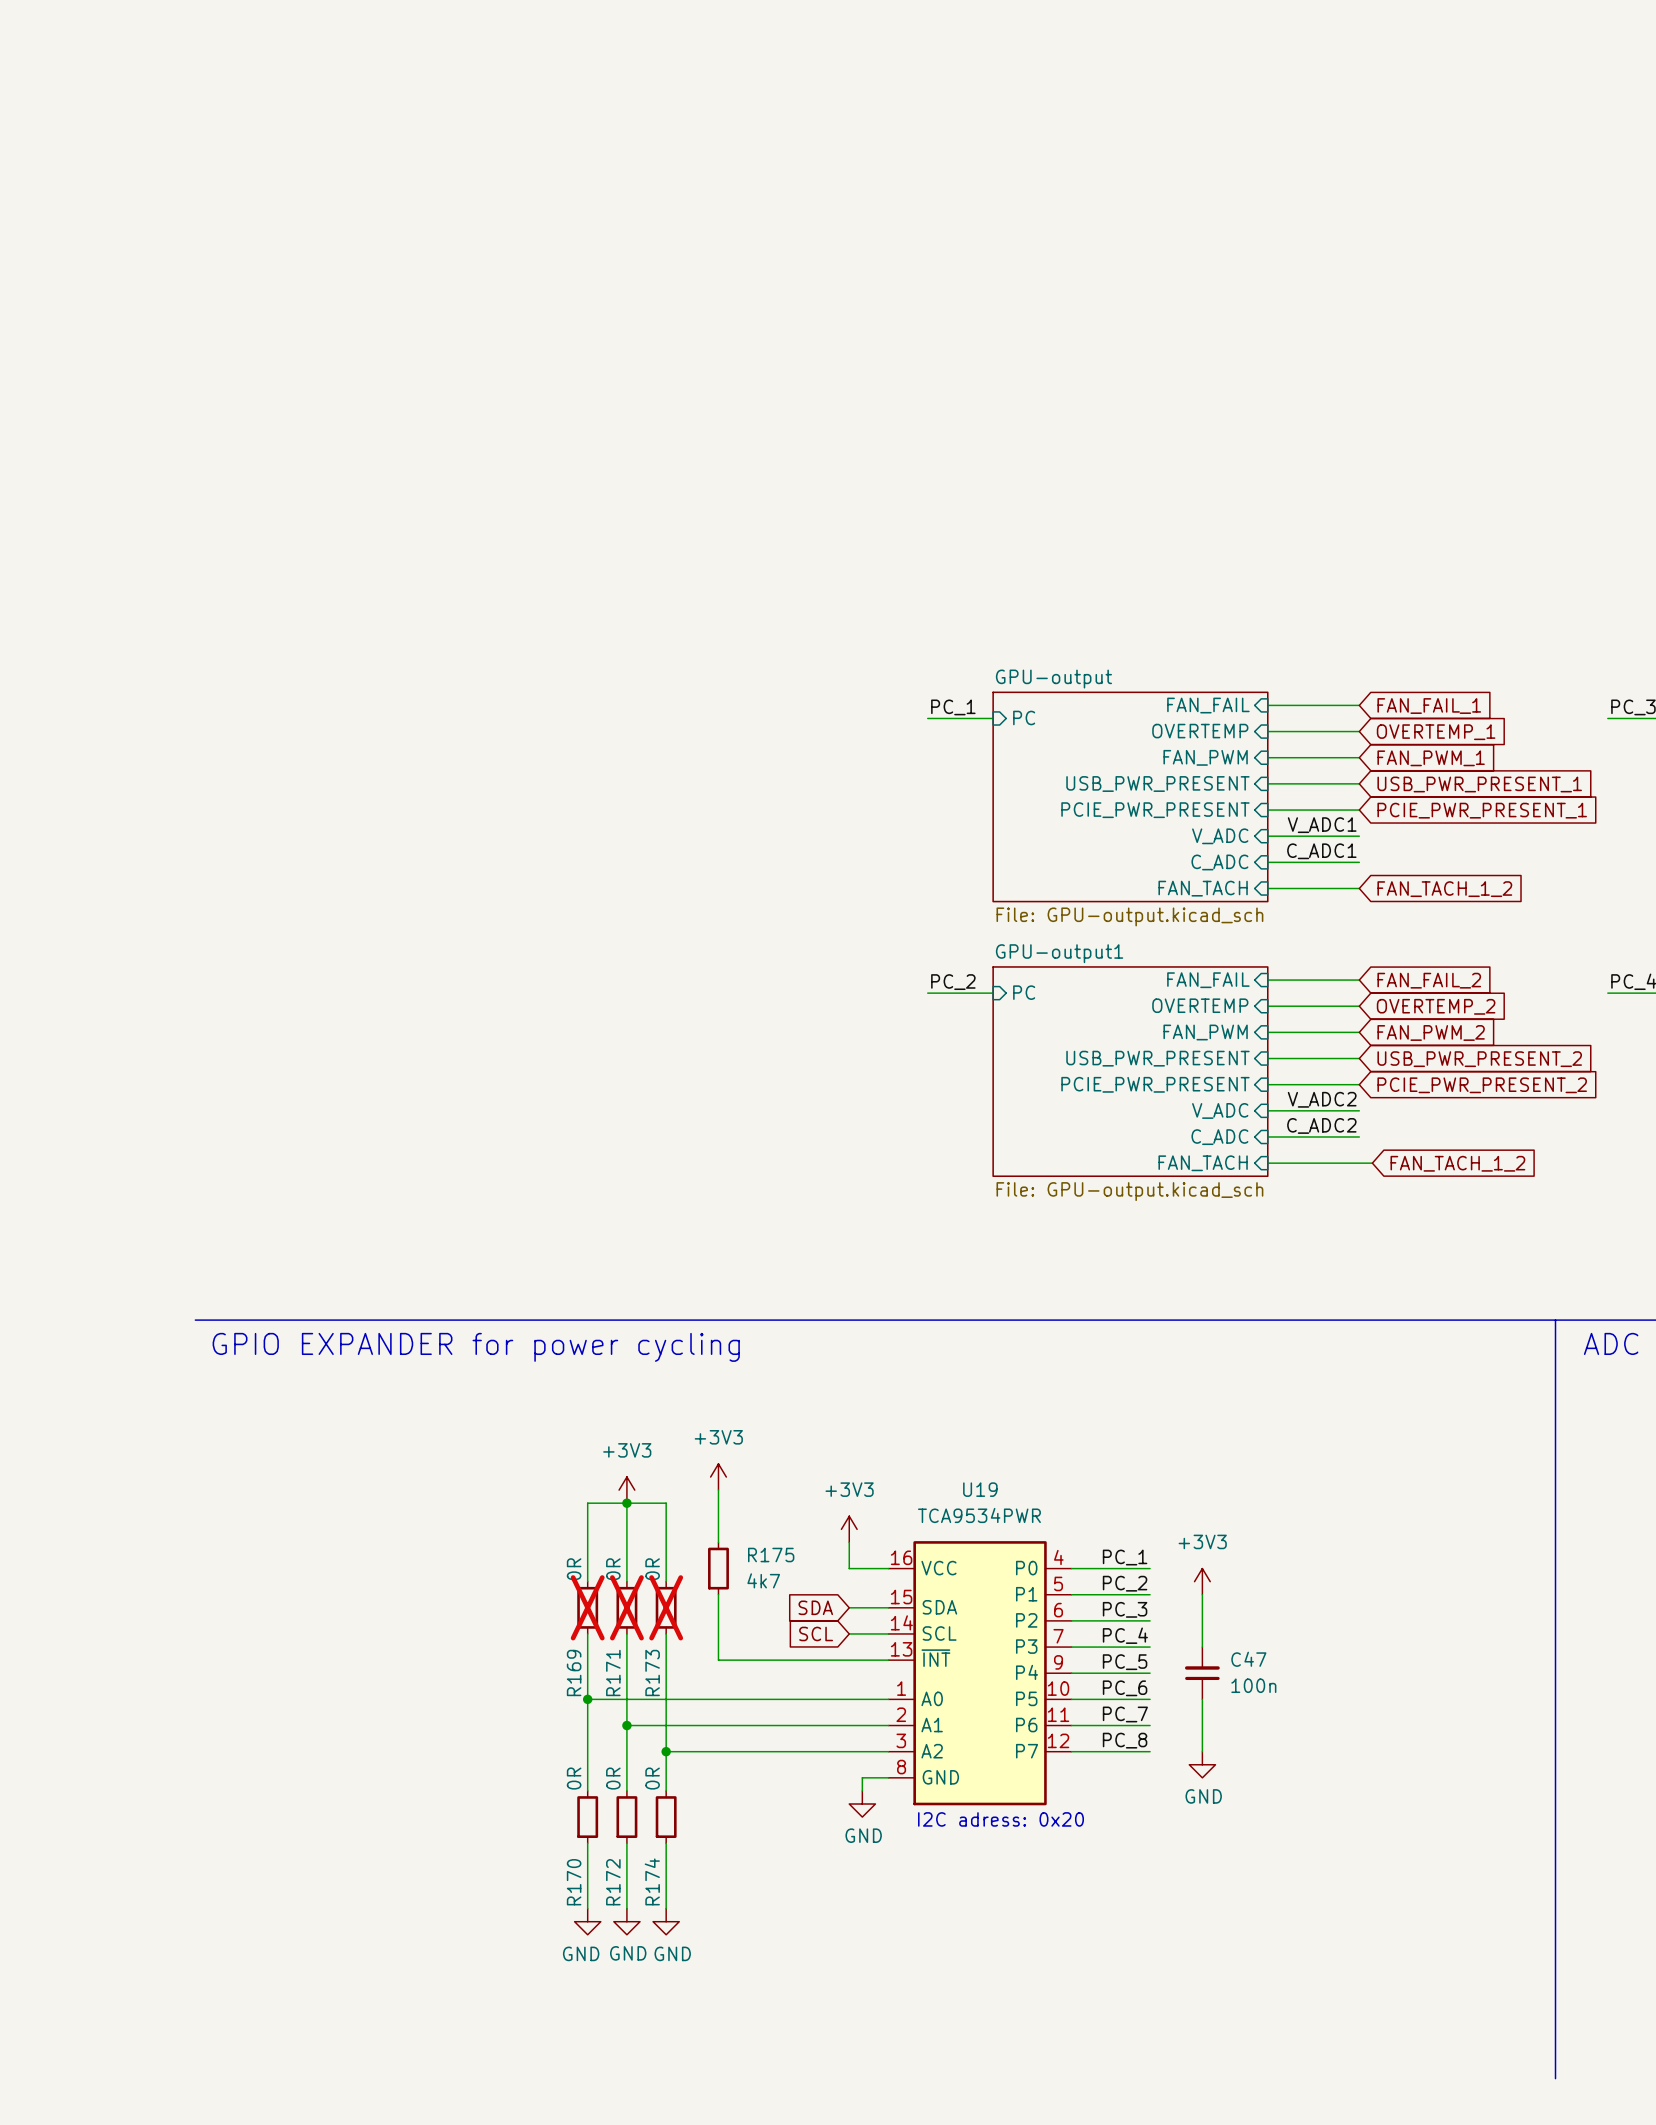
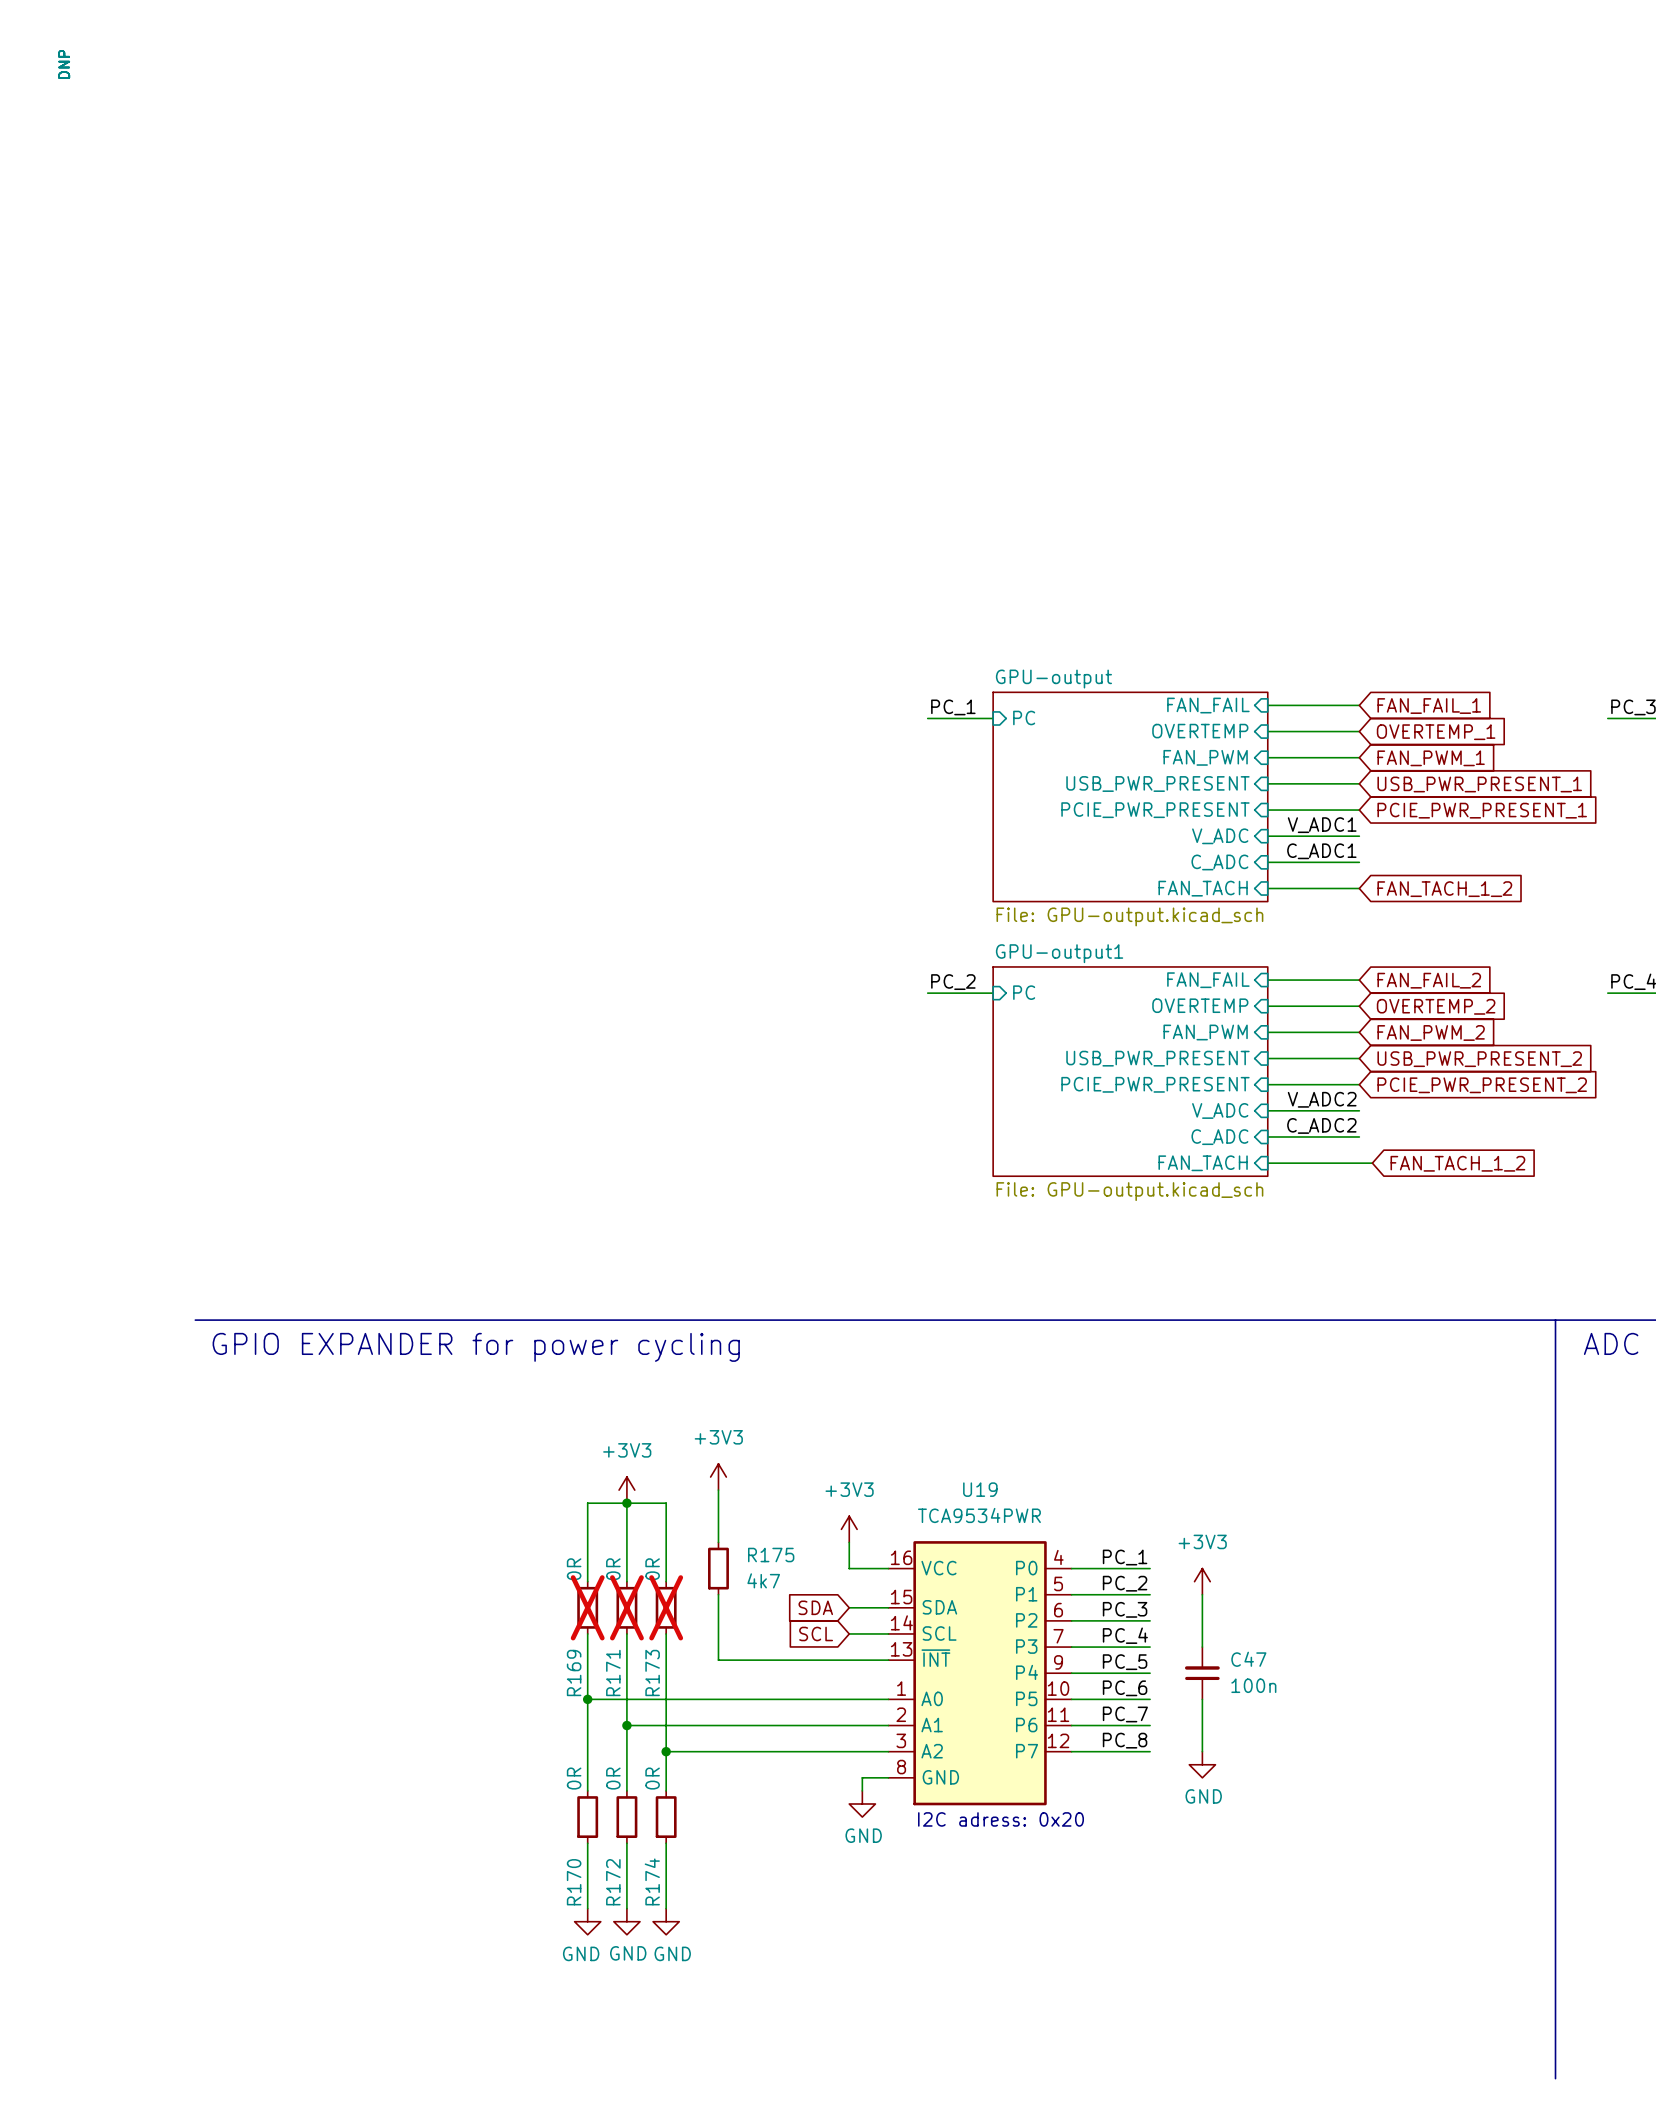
R173 text: none -> DNP (64, 64)
R171 text: none -> DNP (64, 64)
R169 text: none -> DNP (64, 64)

